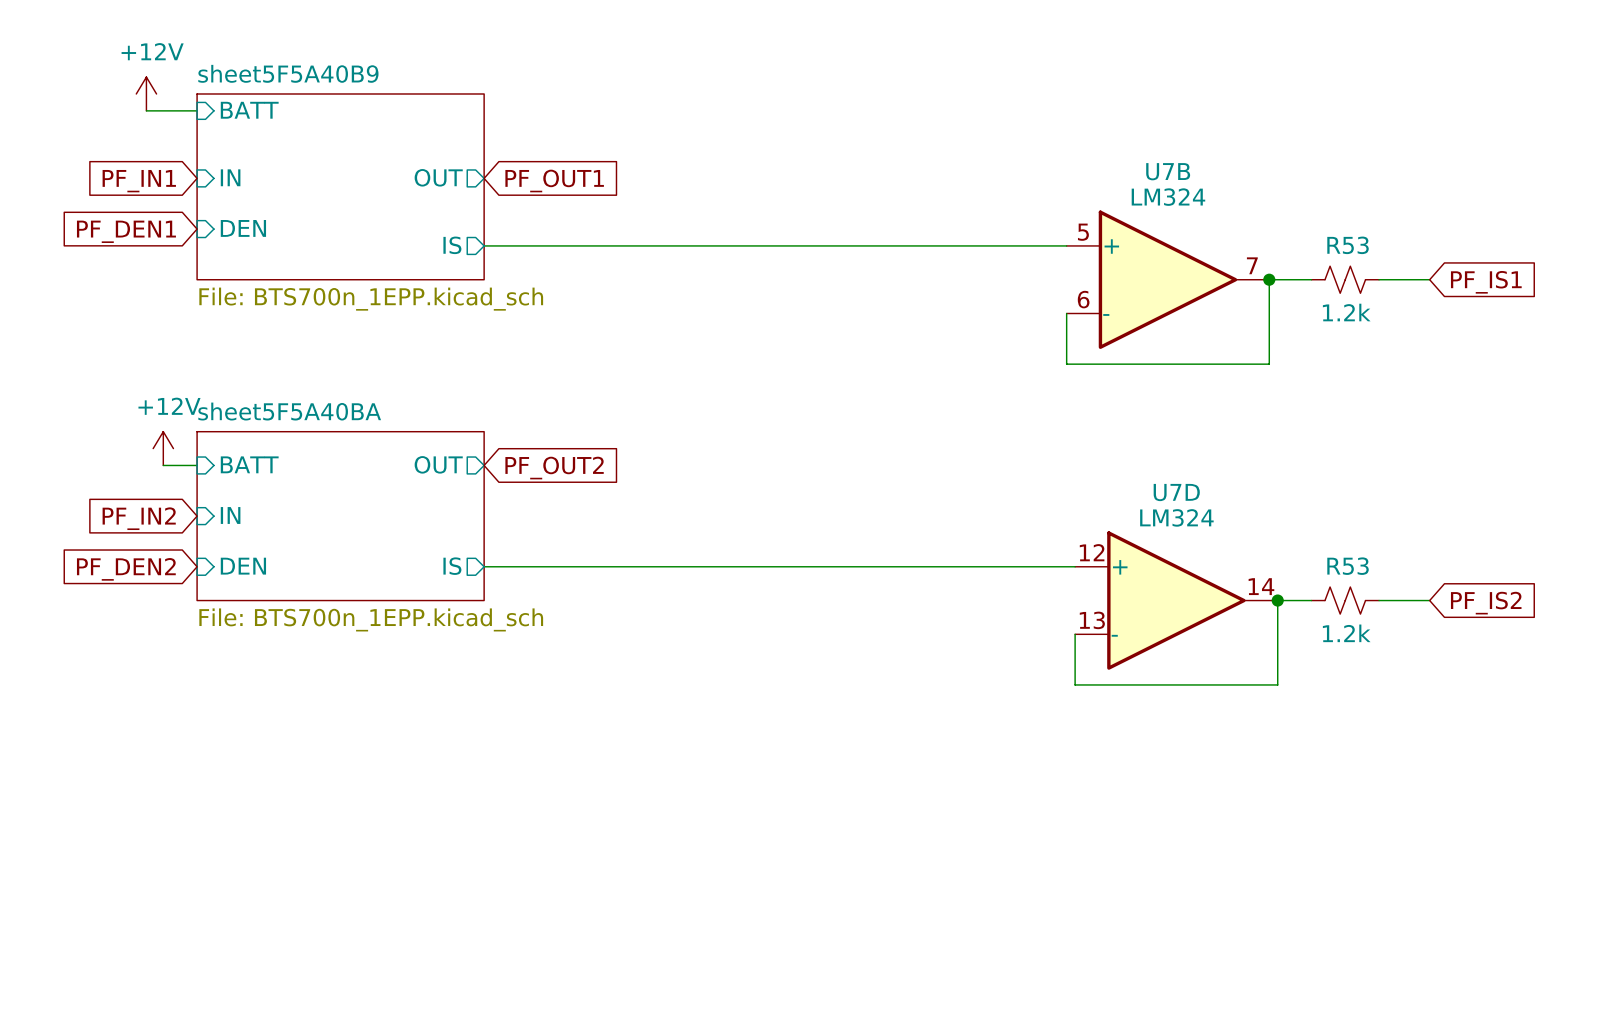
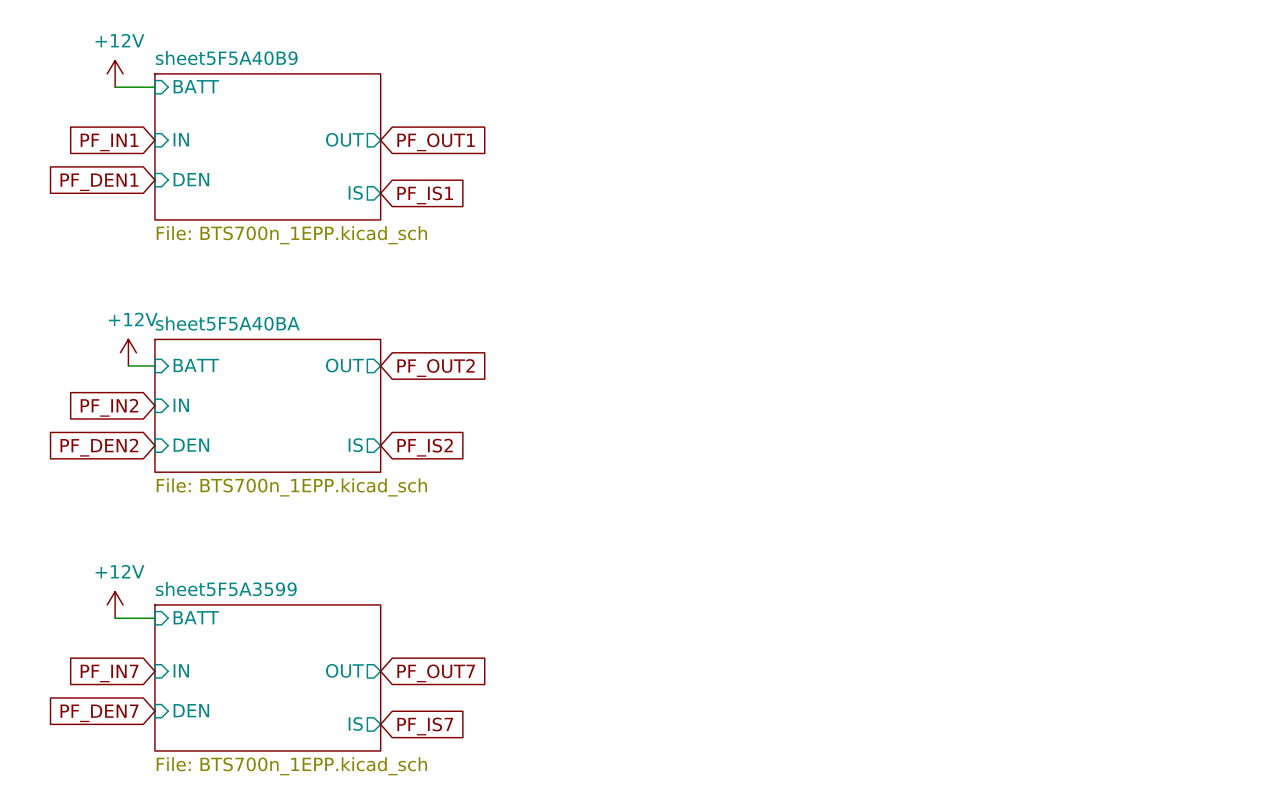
wire: (484, 245) (1066, 245) -> none
global label: none -> PF_IS1 (425, 195)
U7B: LM324 (1167, 279) -> none
junction: (1269, 279) -> none
wire: (1311, 279) (1269, 279) (1269, 364) (1066, 364) (1066, 313) -> none
R53: 1.2k (1345, 279) -> none
wire: (1379, 279) (1429, 279) -> none
global label: PF_IS1 (1486, 282) -> none
wire: (484, 566) (1075, 566) -> none
global label: none -> PF_IS2 (425, 447)
U7D: LM324 (1176, 600) -> none
junction: (1277, 600) -> none
wire: (1311, 600) (1277, 600) (1277, 684) (1075, 684) (1075, 634) -> none
R53: 1.2k (1345, 600) -> none
wire: (1379, 600) (1429, 600) -> none
global label: PF_IS2 (1486, 603) -> none
power symbol: none -> +12V (115, 604)
sheet pin: none -> BATT (196, 617)
wire: none -> (115, 618) (154, 618)
sheet pin: none -> IN (181, 670)
sheet pin: none -> OUT (344, 670)
global label: none -> PF_IN7 (109, 673)
global label: none -> PF_OUT7 (436, 673)
sheet sheet5F5A3599: none -> File: BTS700n_1EPP.kicad_sch (267, 677)
sheet pin: none -> DEN (191, 710)
global label: none -> PF_DEN7 (99, 713)
sheet pin: none -> IS (355, 723)
global label: none -> PF_IS7 (425, 726)

